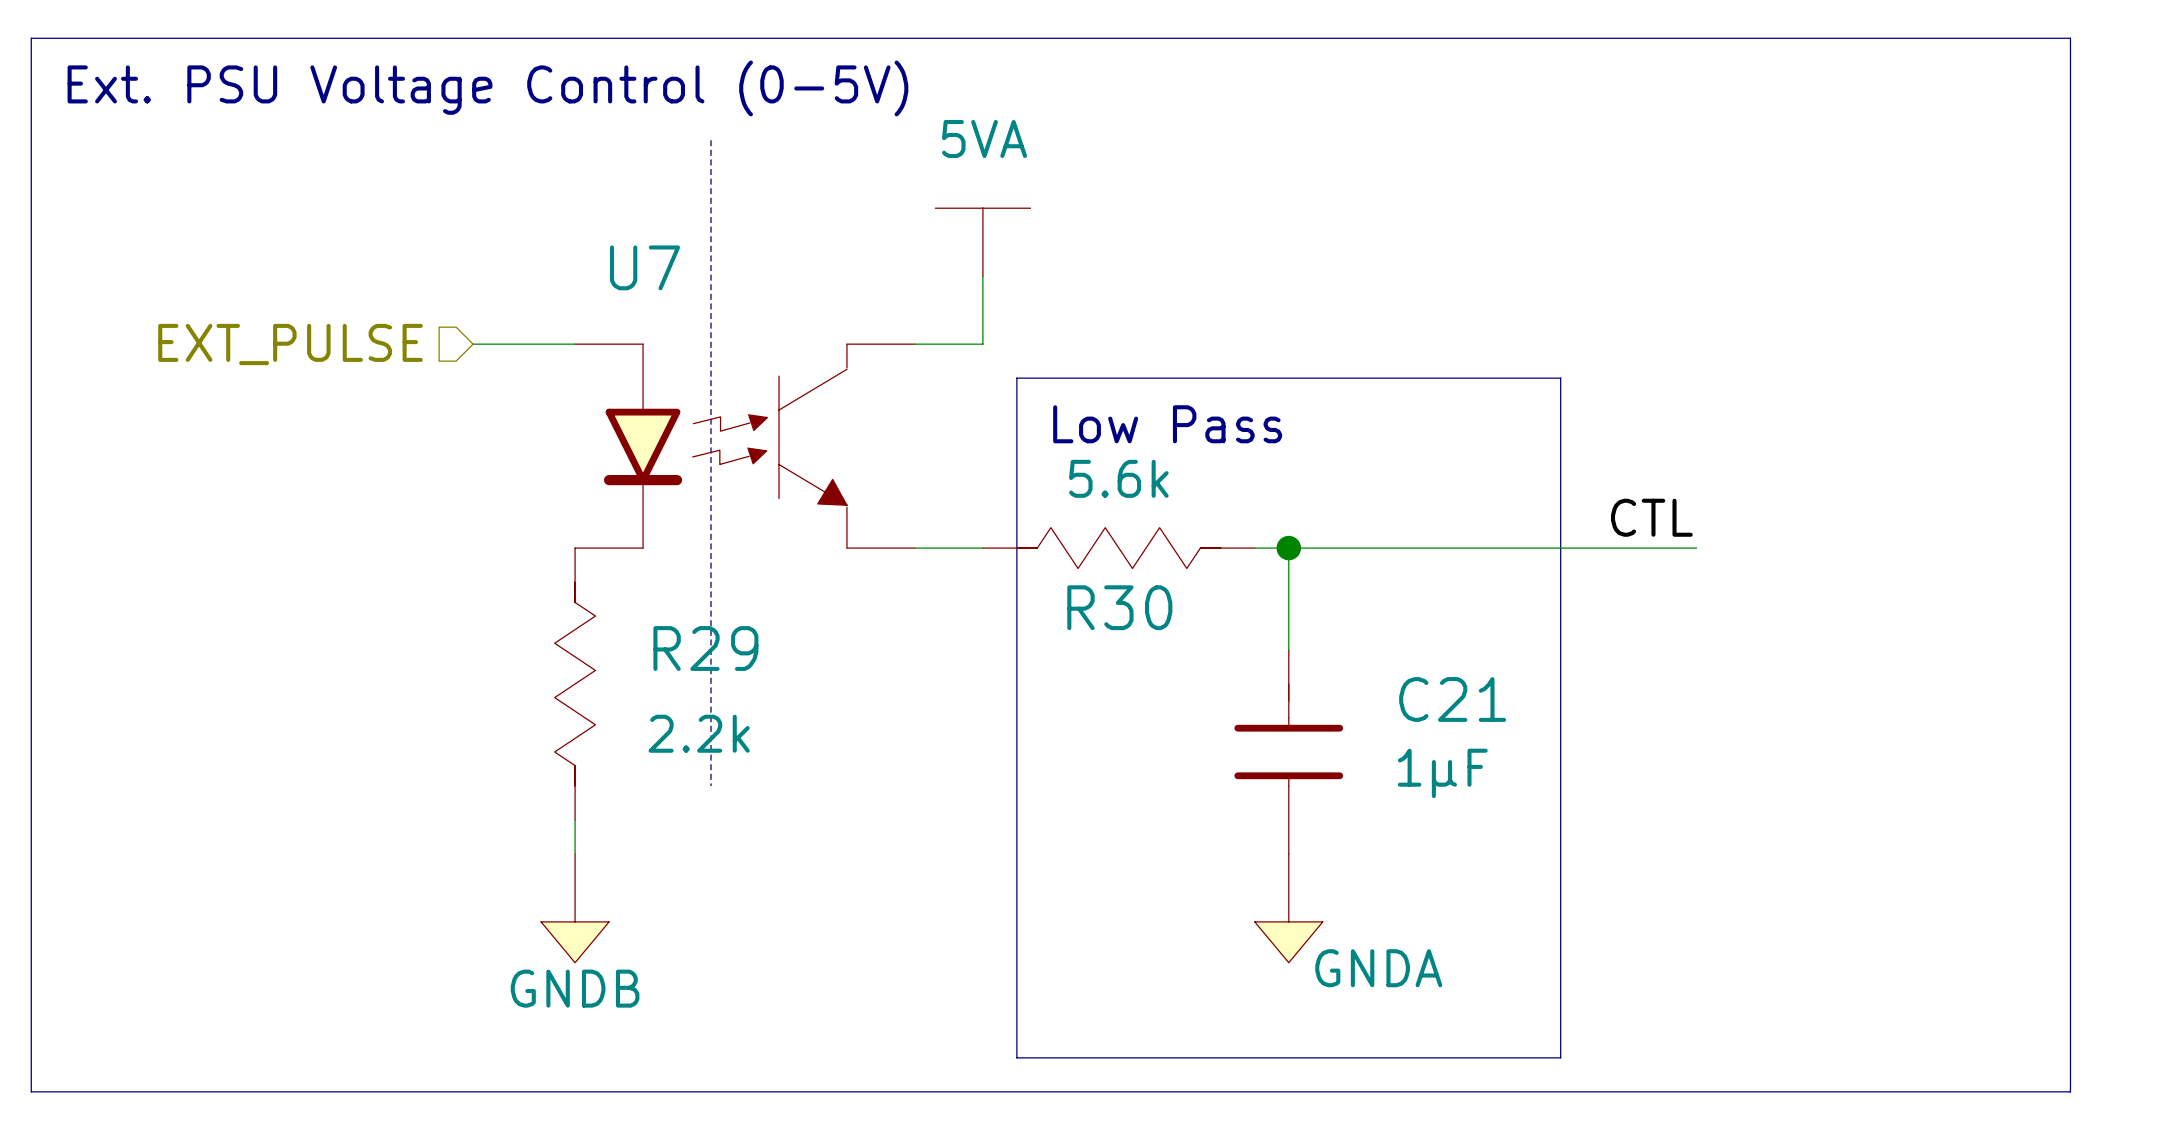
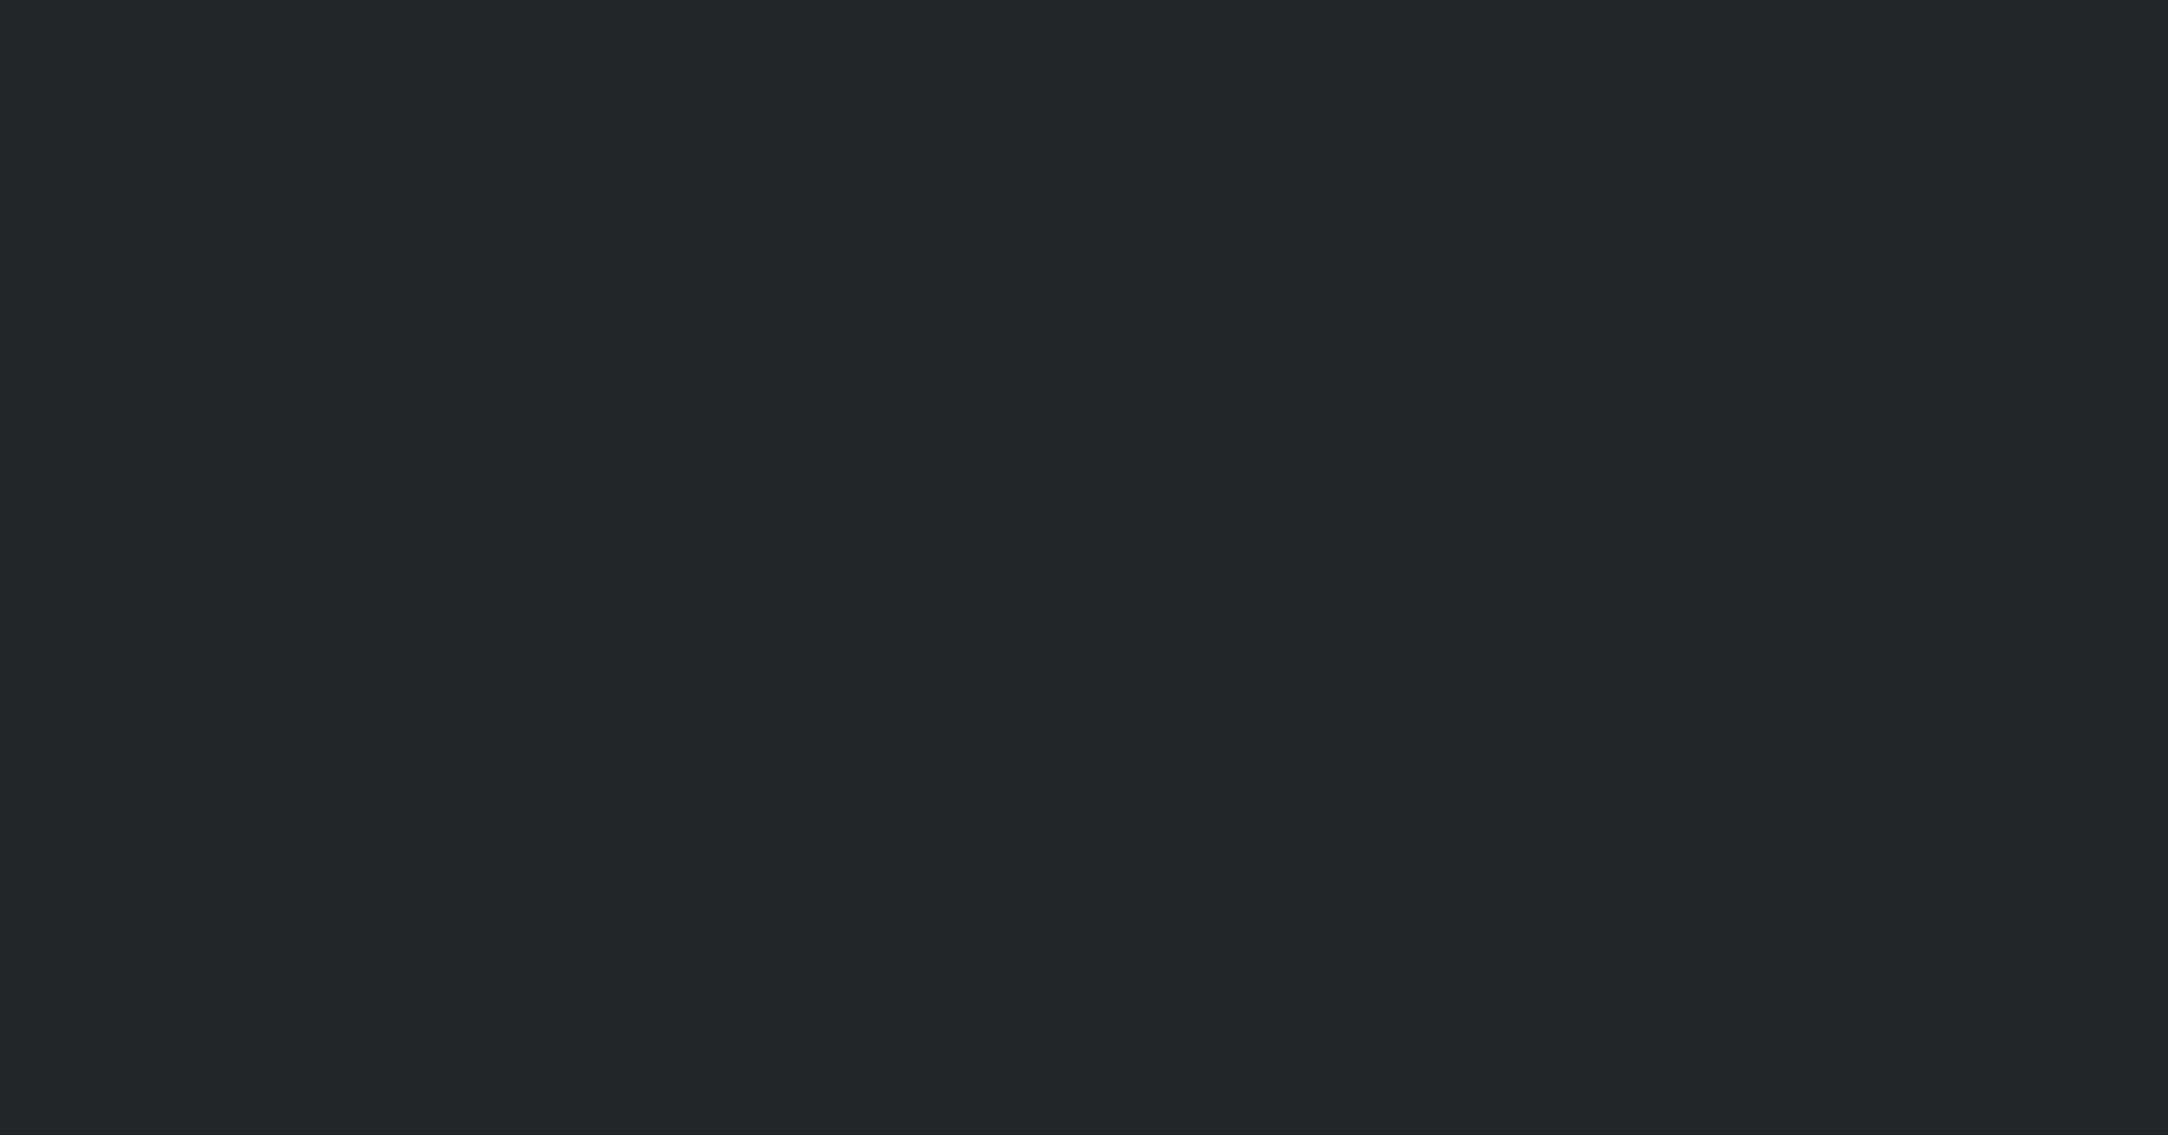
line: (31, 38) (2070, 38) (2070, 1091) (31, 1091) (31, 38) -> none
text: Ext. PSU Voltage Control (0-5V) (487, 88) -> none
line: (711, 140) (711, 785) -> none
power symbol: 5VA (982, 242) -> none
wire: (982, 276) (982, 344) (914, 344) -> none
hierarchical label: EXT_PULSE (290, 344) -> none
wire: (473, 344) (575, 344) -> none
line: (1016, 378) (1560, 378) (1560, 1057) (1016, 1057) (1016, 378) -> none
text: Low Pass (1167, 424) -> none
U7: (745, 446) -> none
label: CTL (1651, 517) -> none
wire: (914, 548) (982, 548) -> none
R30: (1118, 548) -> none
wire: (1254, 548) (1696, 548) -> none
wire: (1288, 548) (1288, 650) -> none
junction: (1288, 548) -> none
R29: (575, 684) -> none
C21: (1288, 751) -> none
wire: (575, 819) (575, 853) -> none
power symbol: GNDB (575, 908) -> none
power symbol: GNDA (1288, 908) -> none

